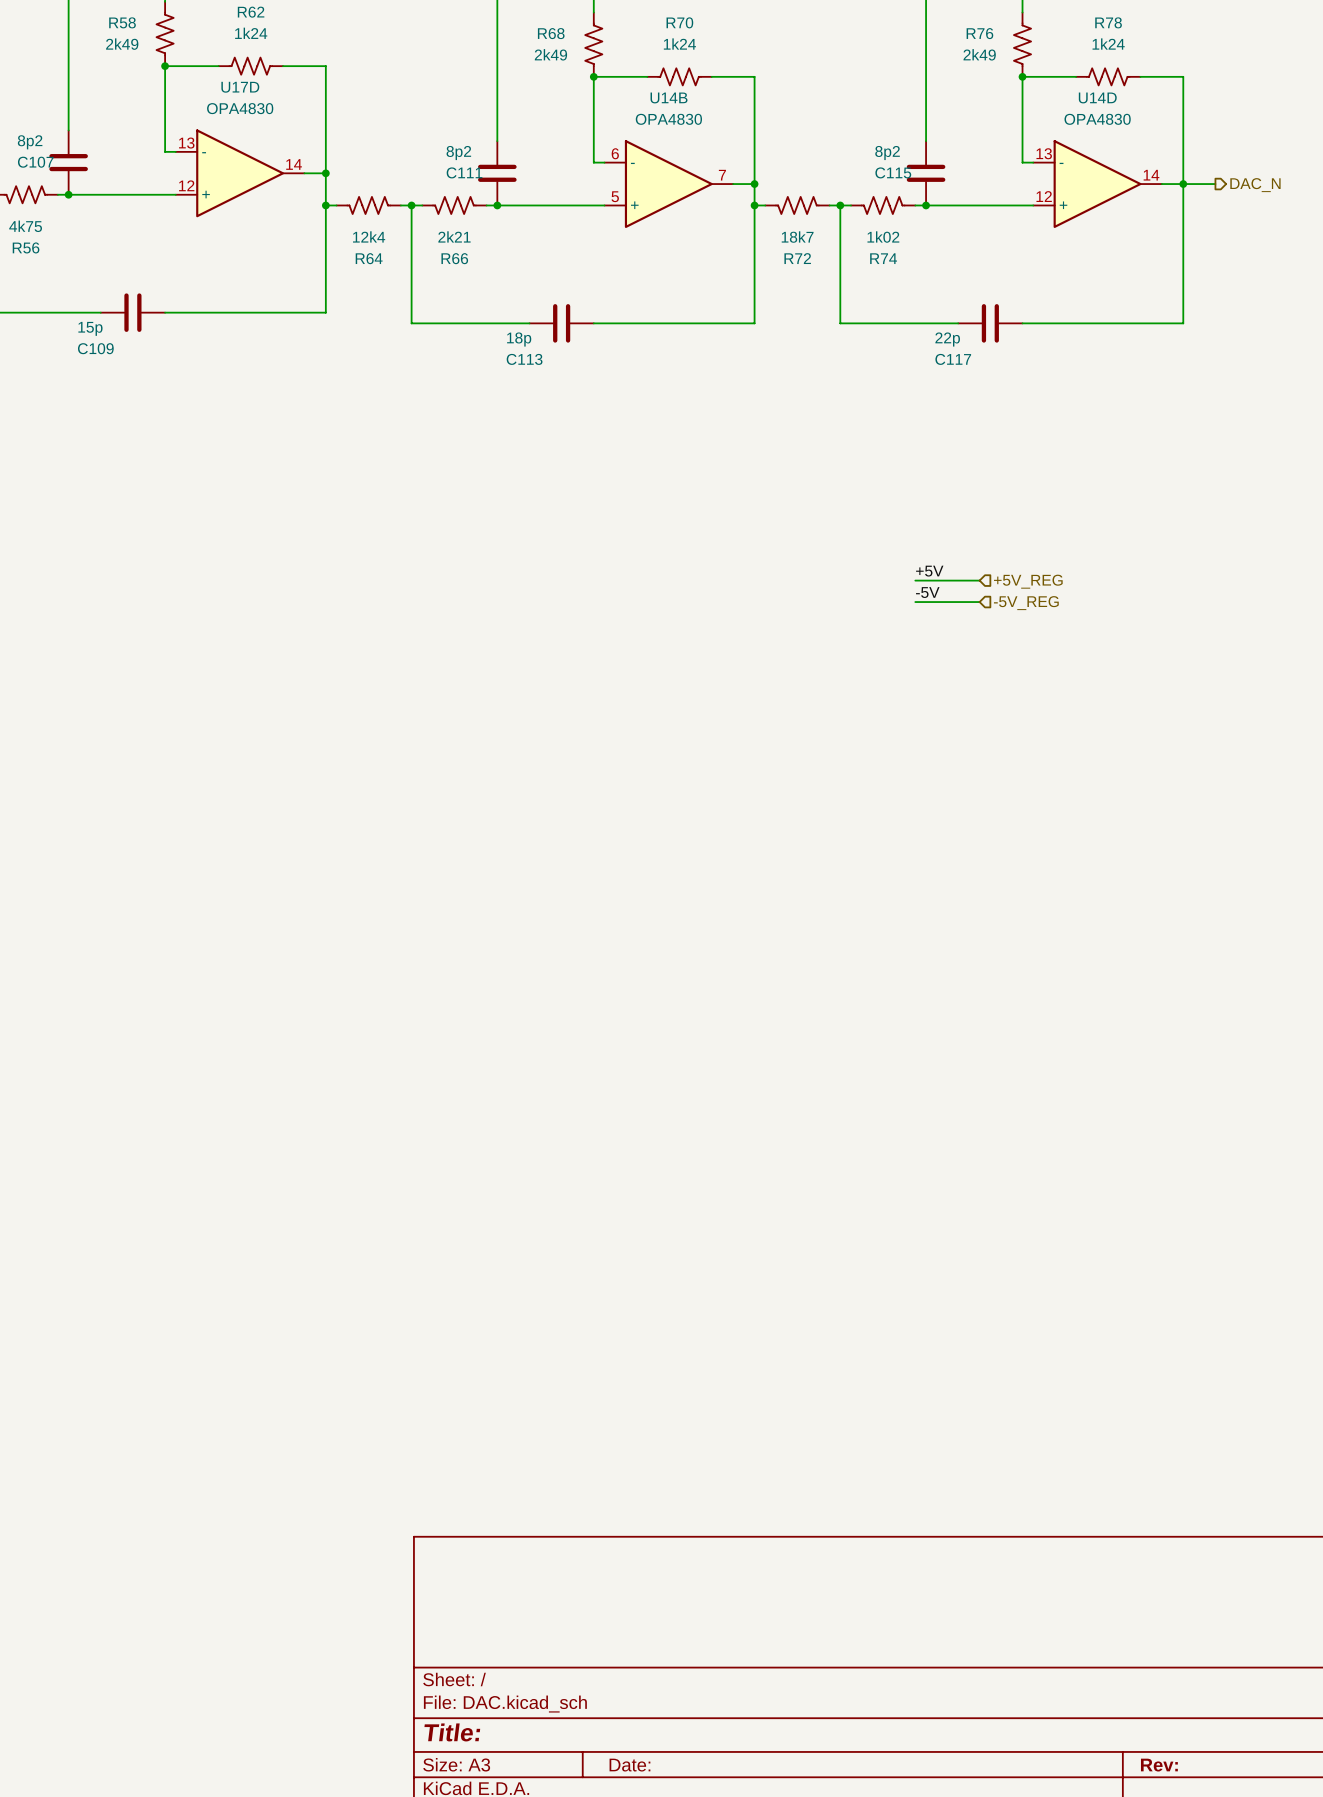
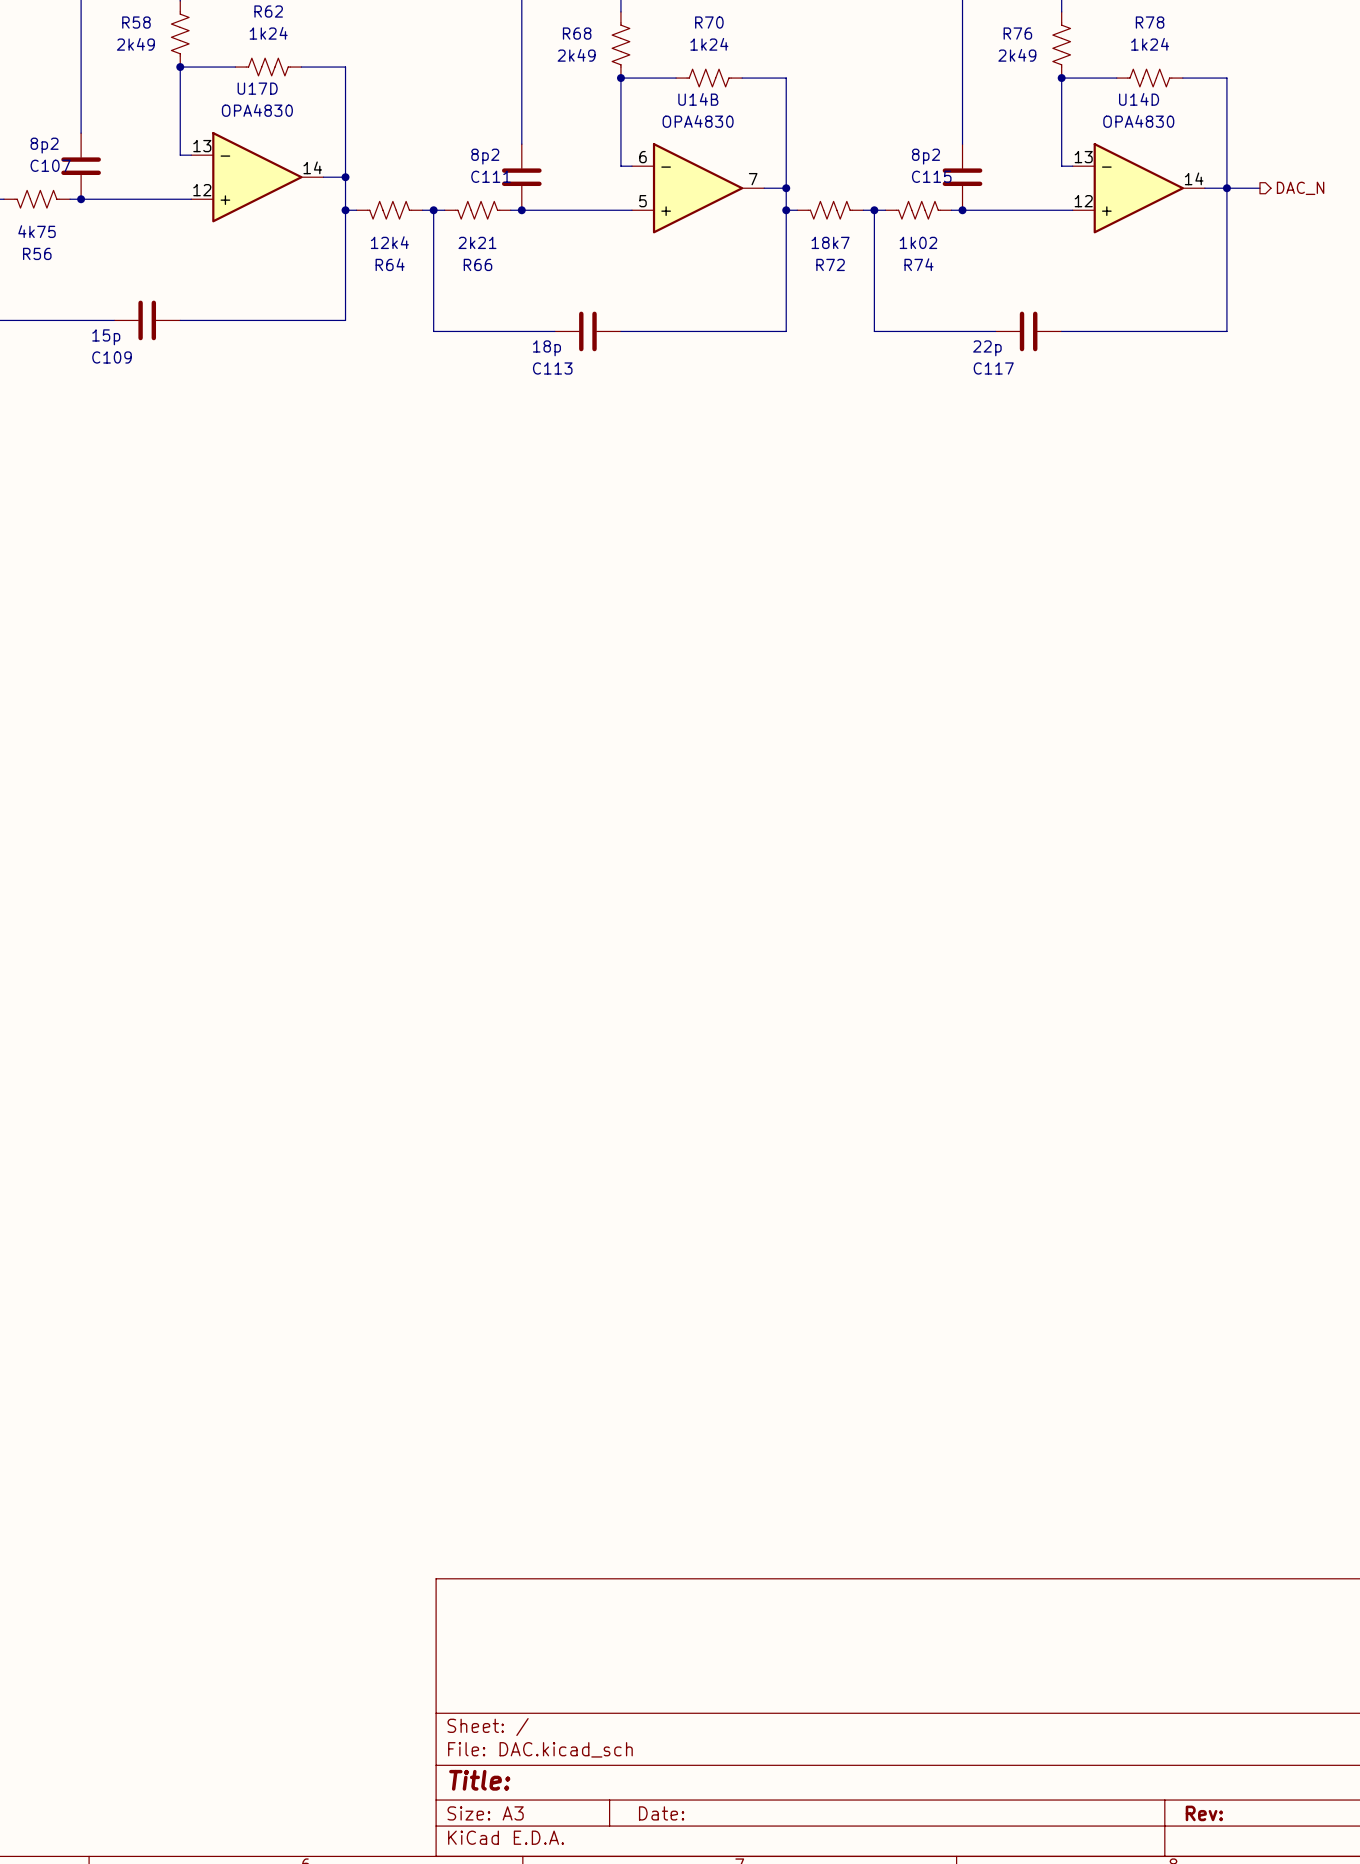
label: +5V (929, 571) -> none
wire: (915, 580) (979, 580) -> none
hierarchical label: +5V_REG (1028, 581) -> none
label: -5V (927, 592) -> none
wire: (915, 602) (979, 602) -> none
hierarchical label: -5V_REG (1026, 603) -> none

